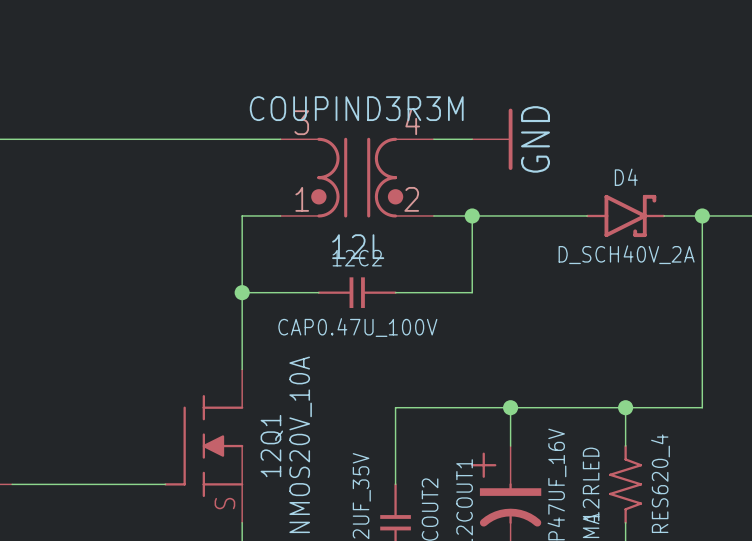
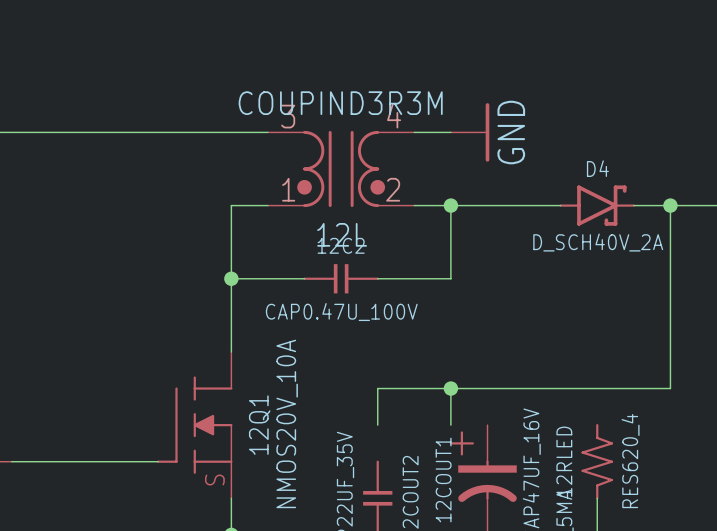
wire: (510, 407) (510, 446) -> (450, 388) (450, 425)
junction position: (510, 407) -> (450, 388)
wire: (625, 407) (625, 446) -> none
junction: (625, 407) -> none
wire: (395, 446) (395, 484) -> none

